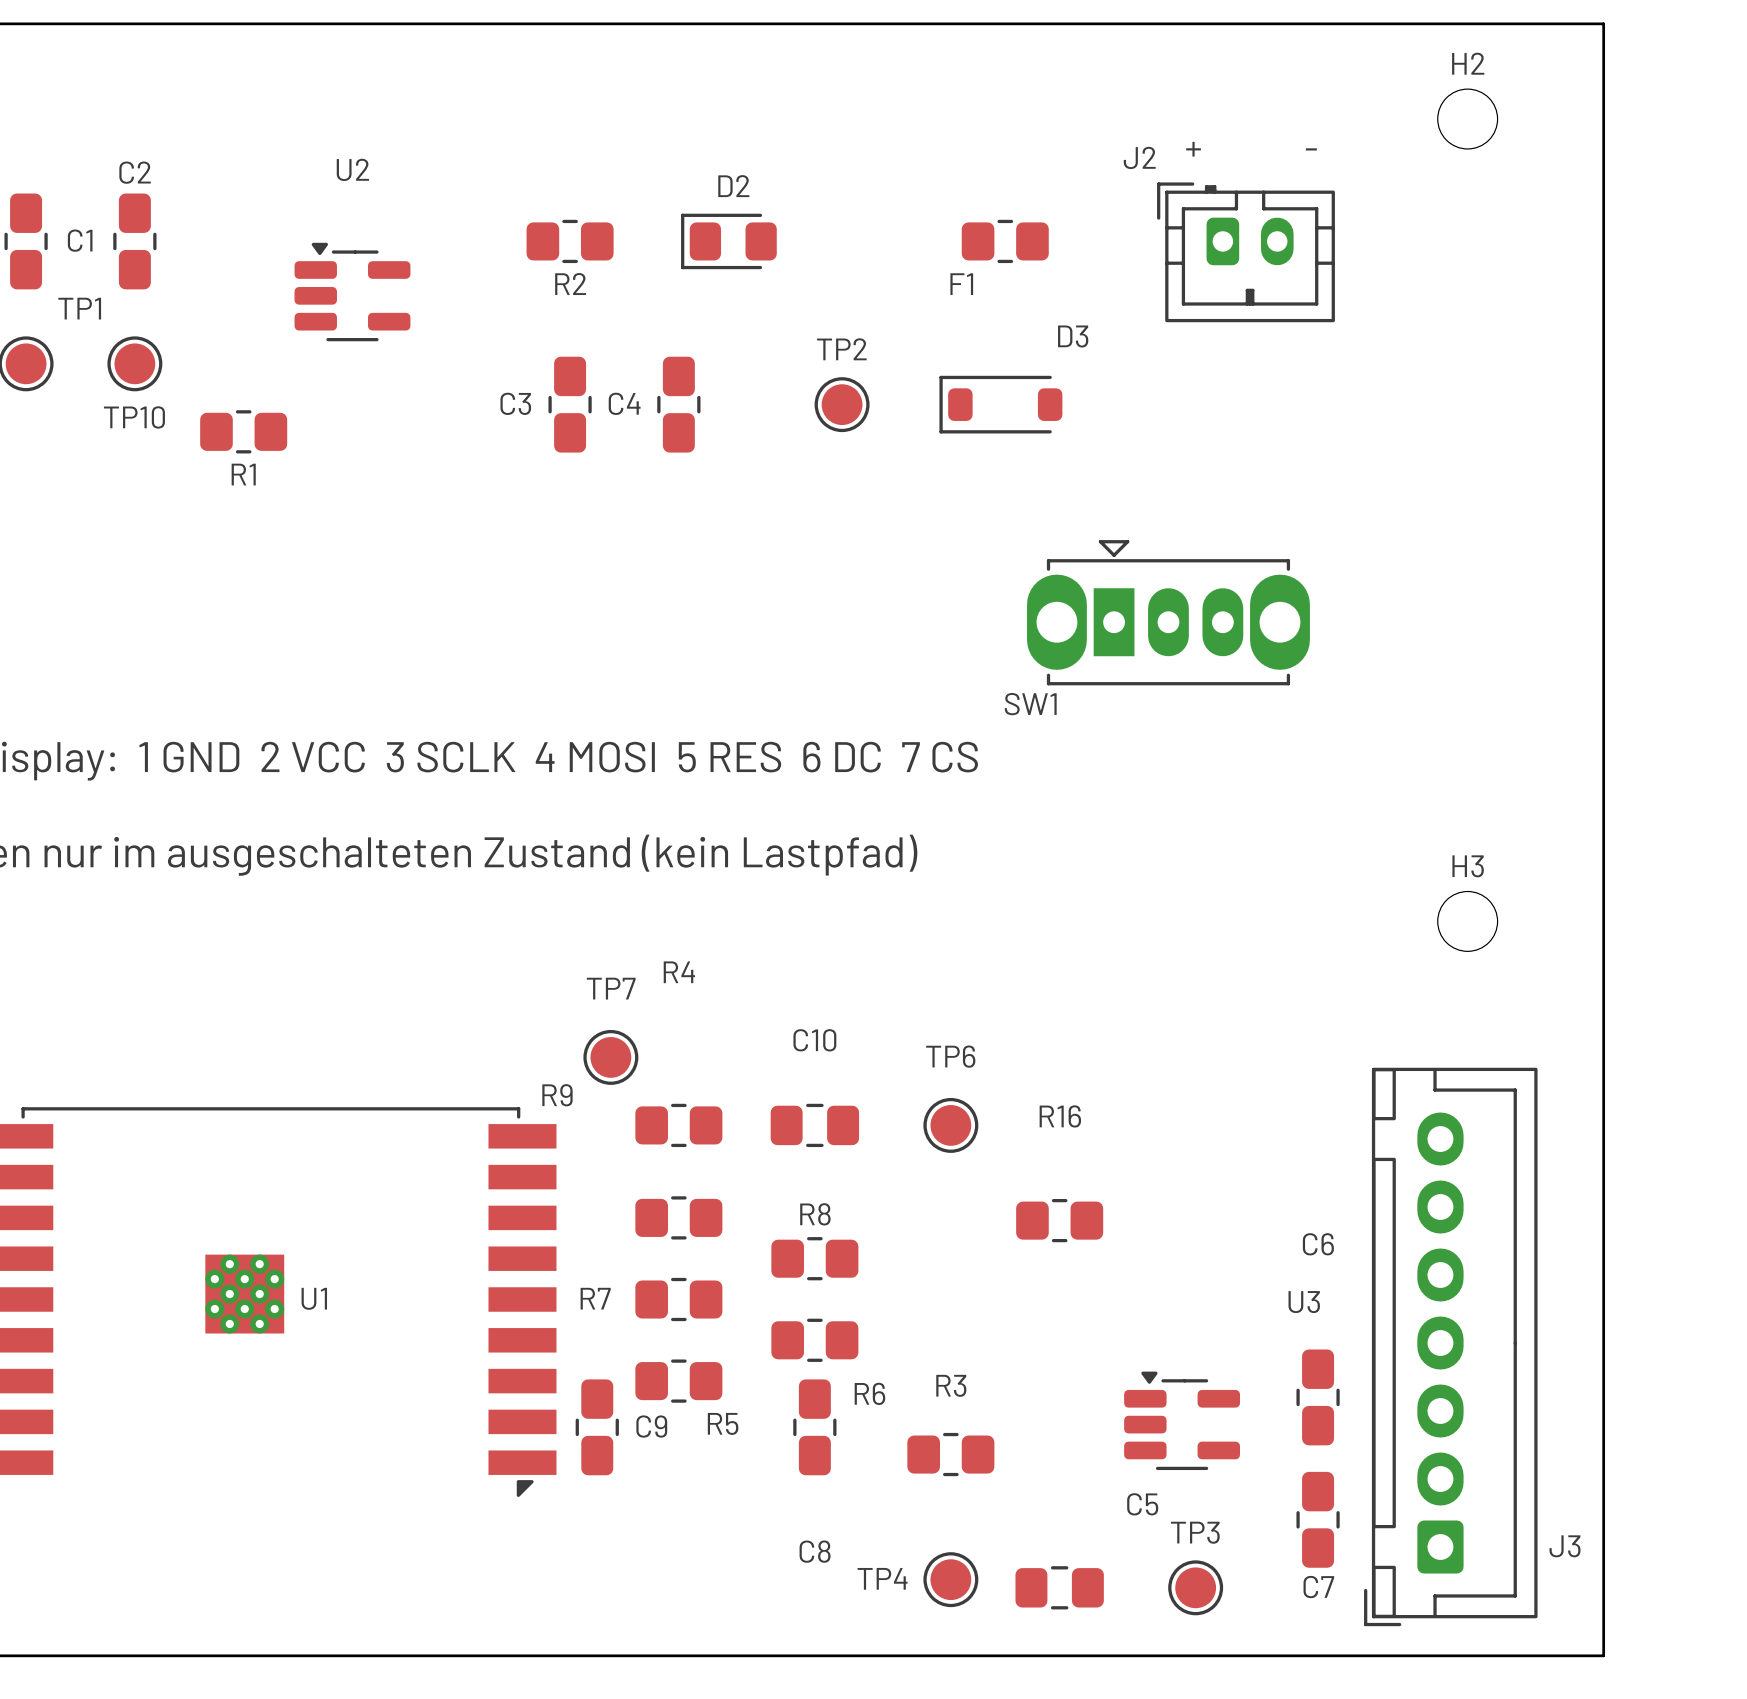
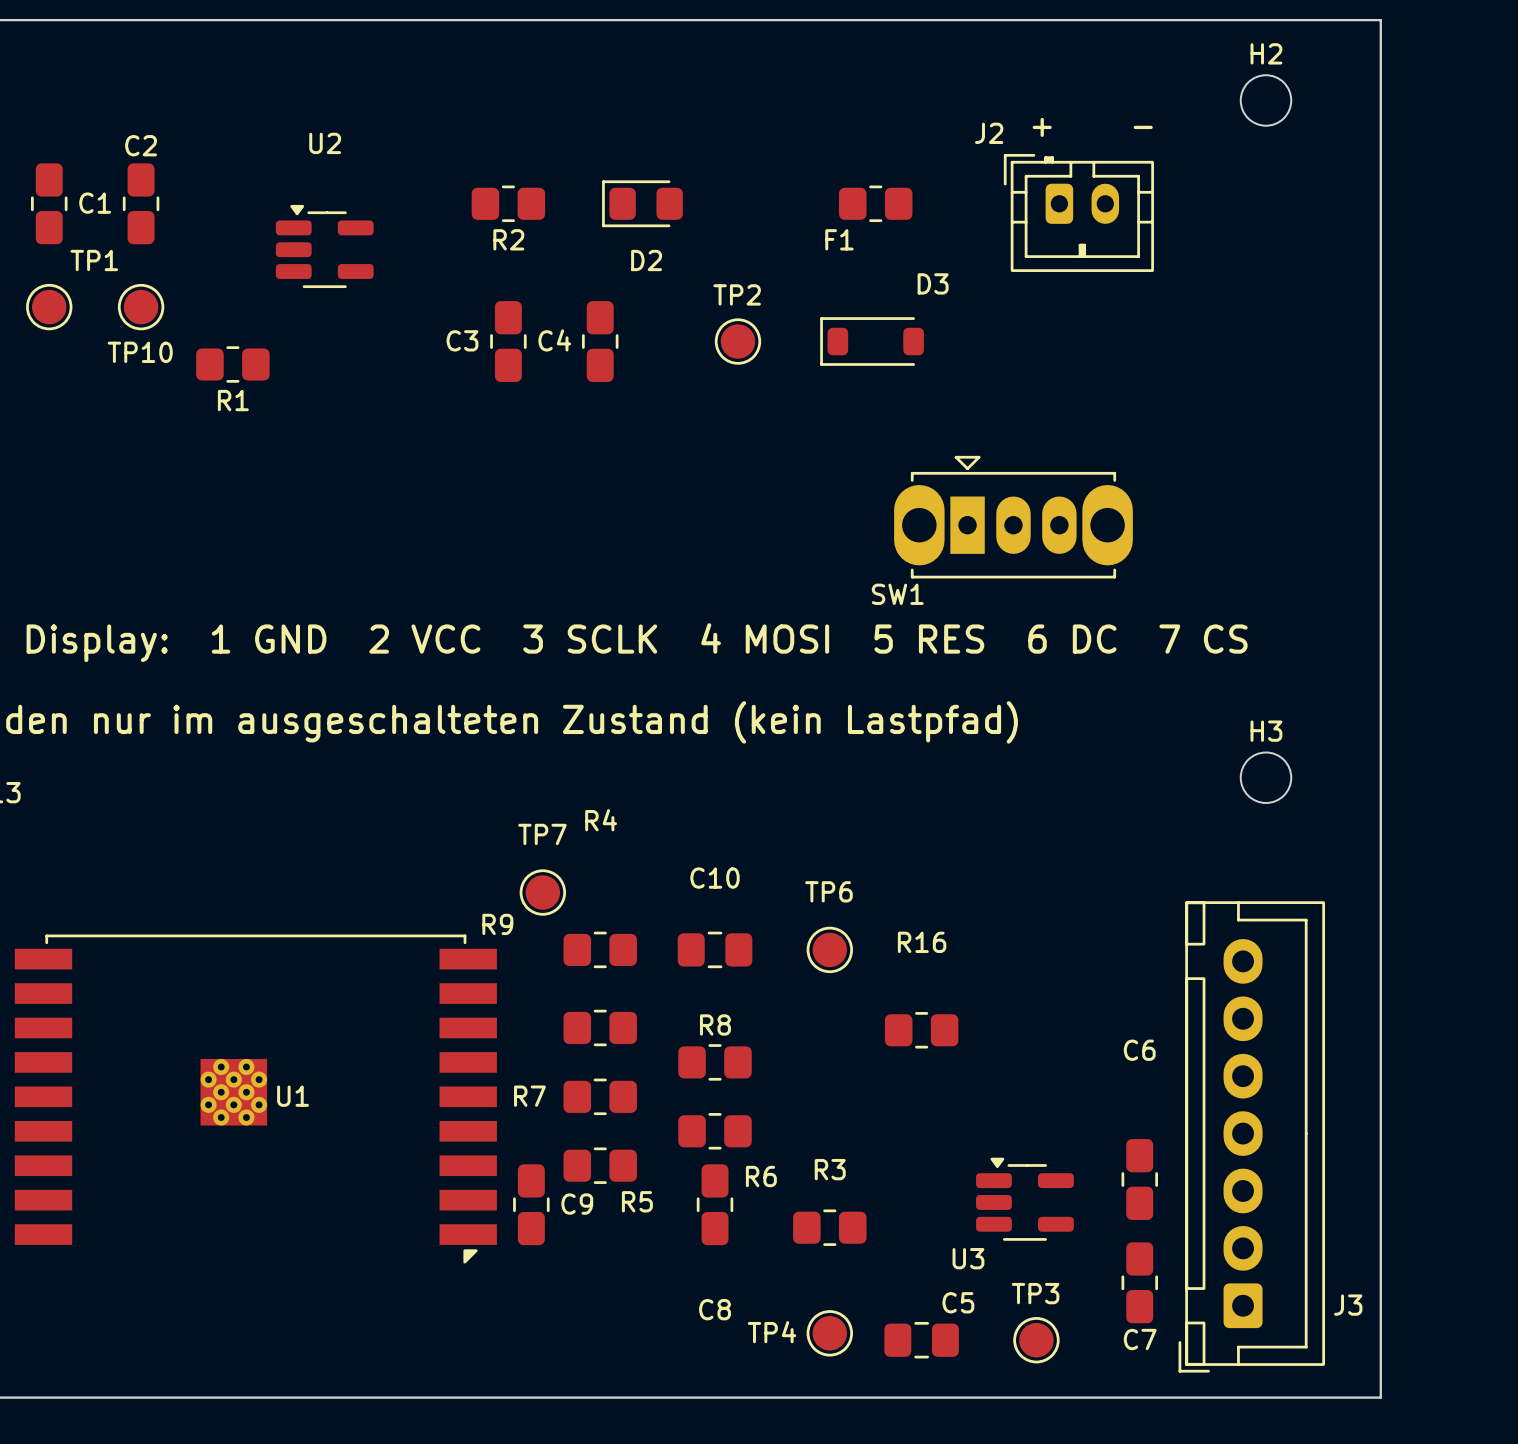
D2 name position: D2 (733, 186) -> D2 (646, 260)
U3 name position: U3 (1304, 1302) -> U3 (968, 1258)
C5 name position: C5 (1142, 1504) -> C5 (958, 1302)

